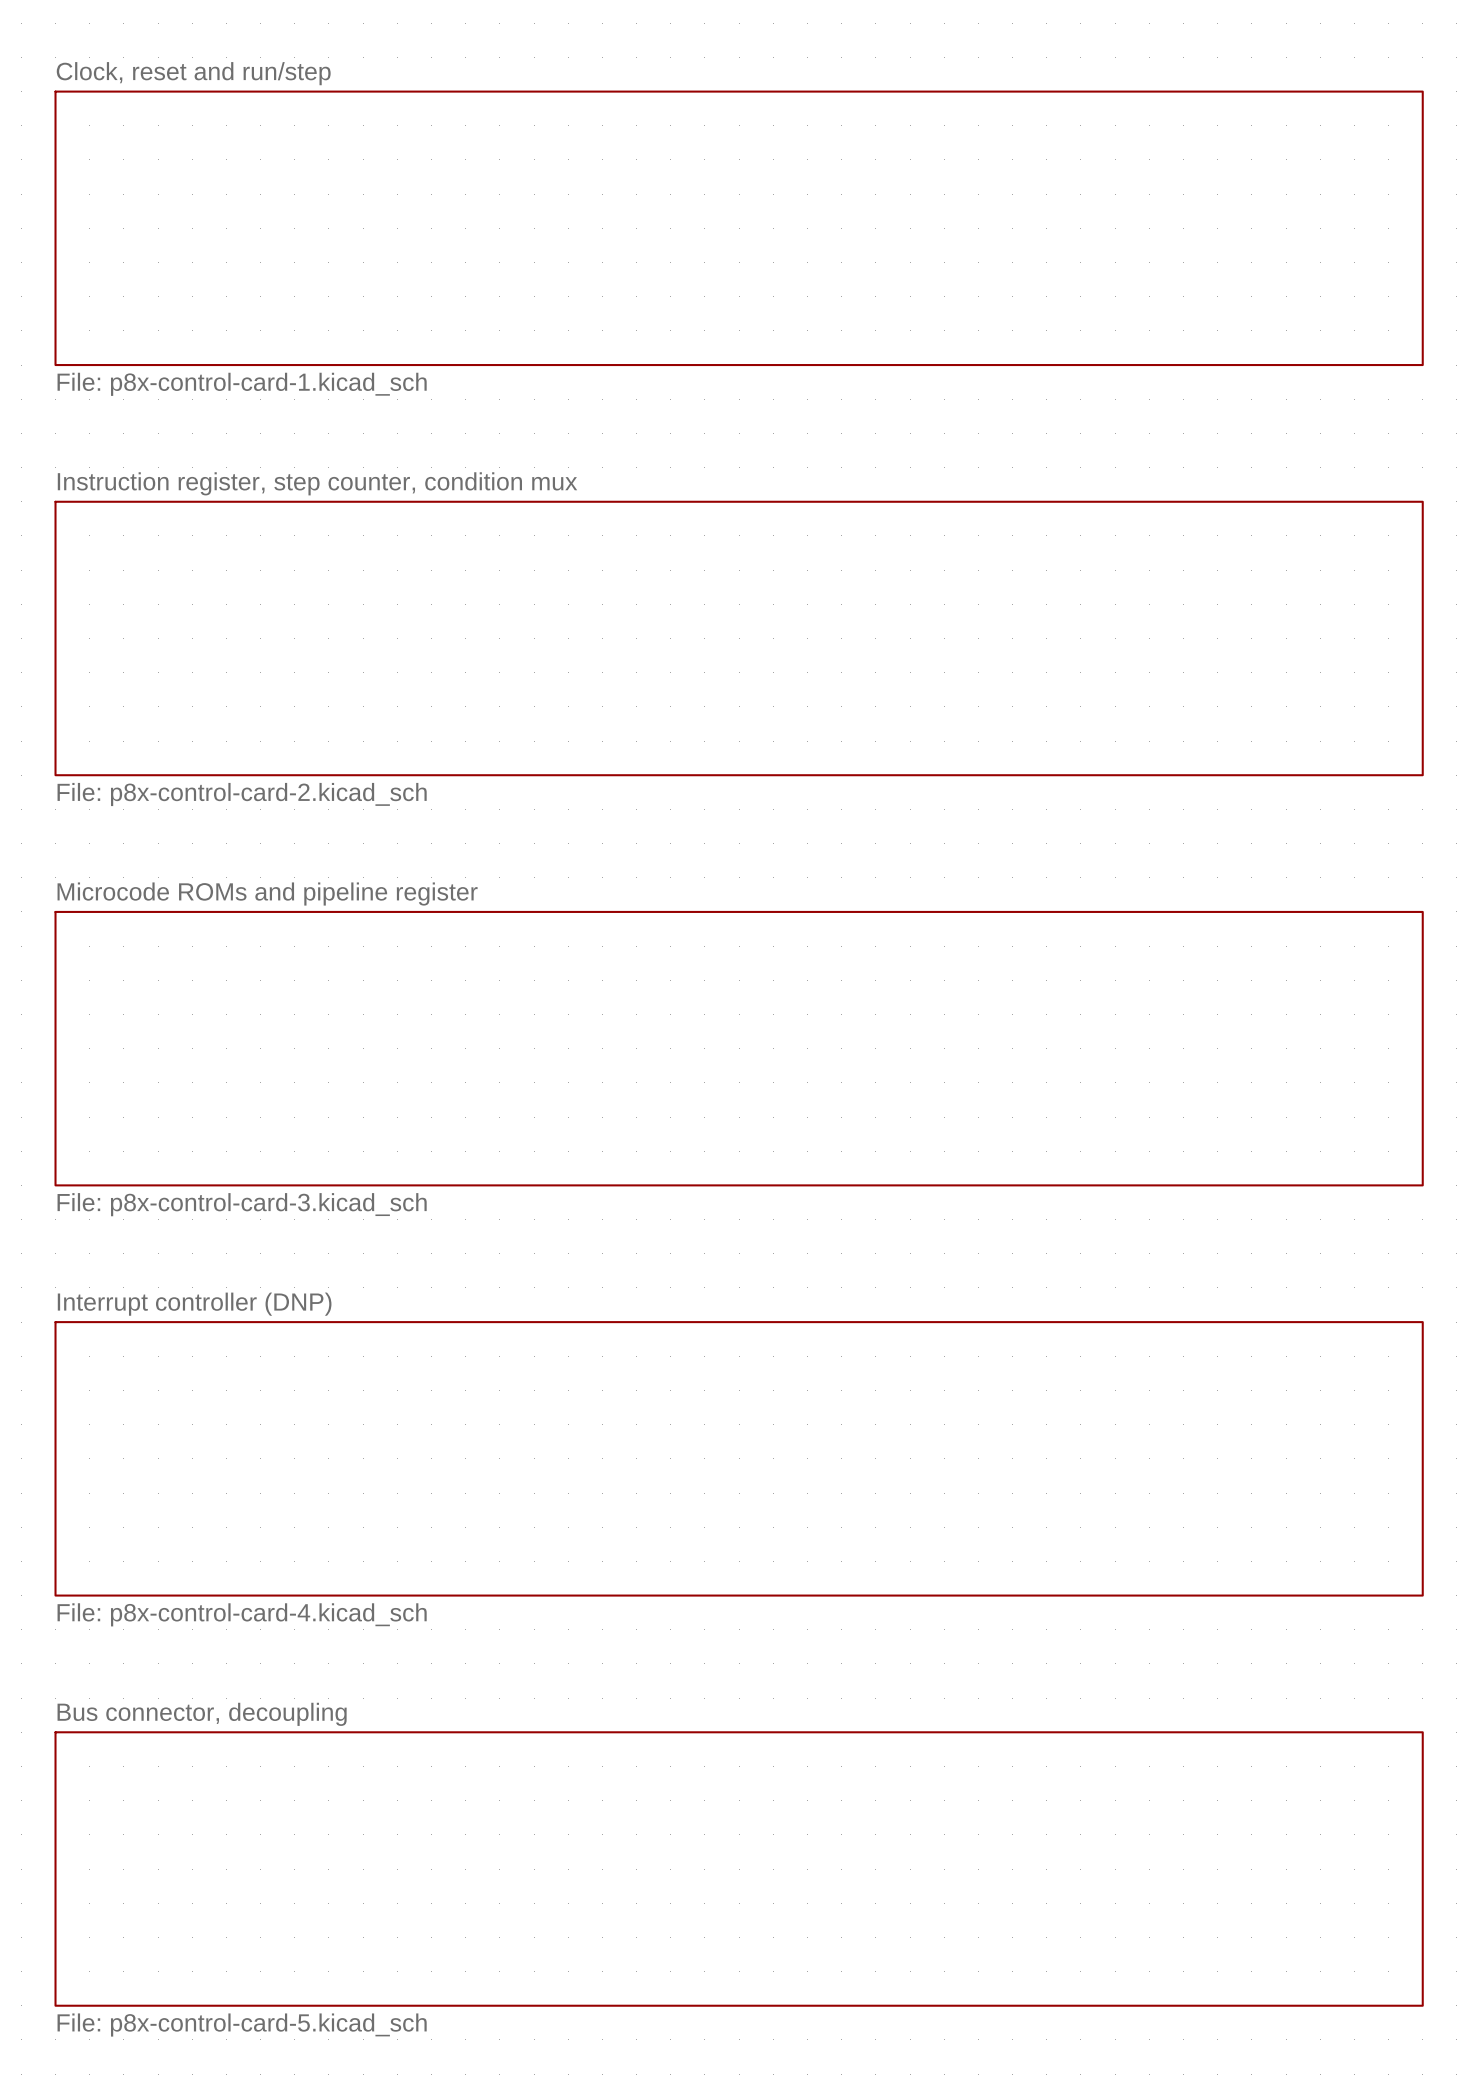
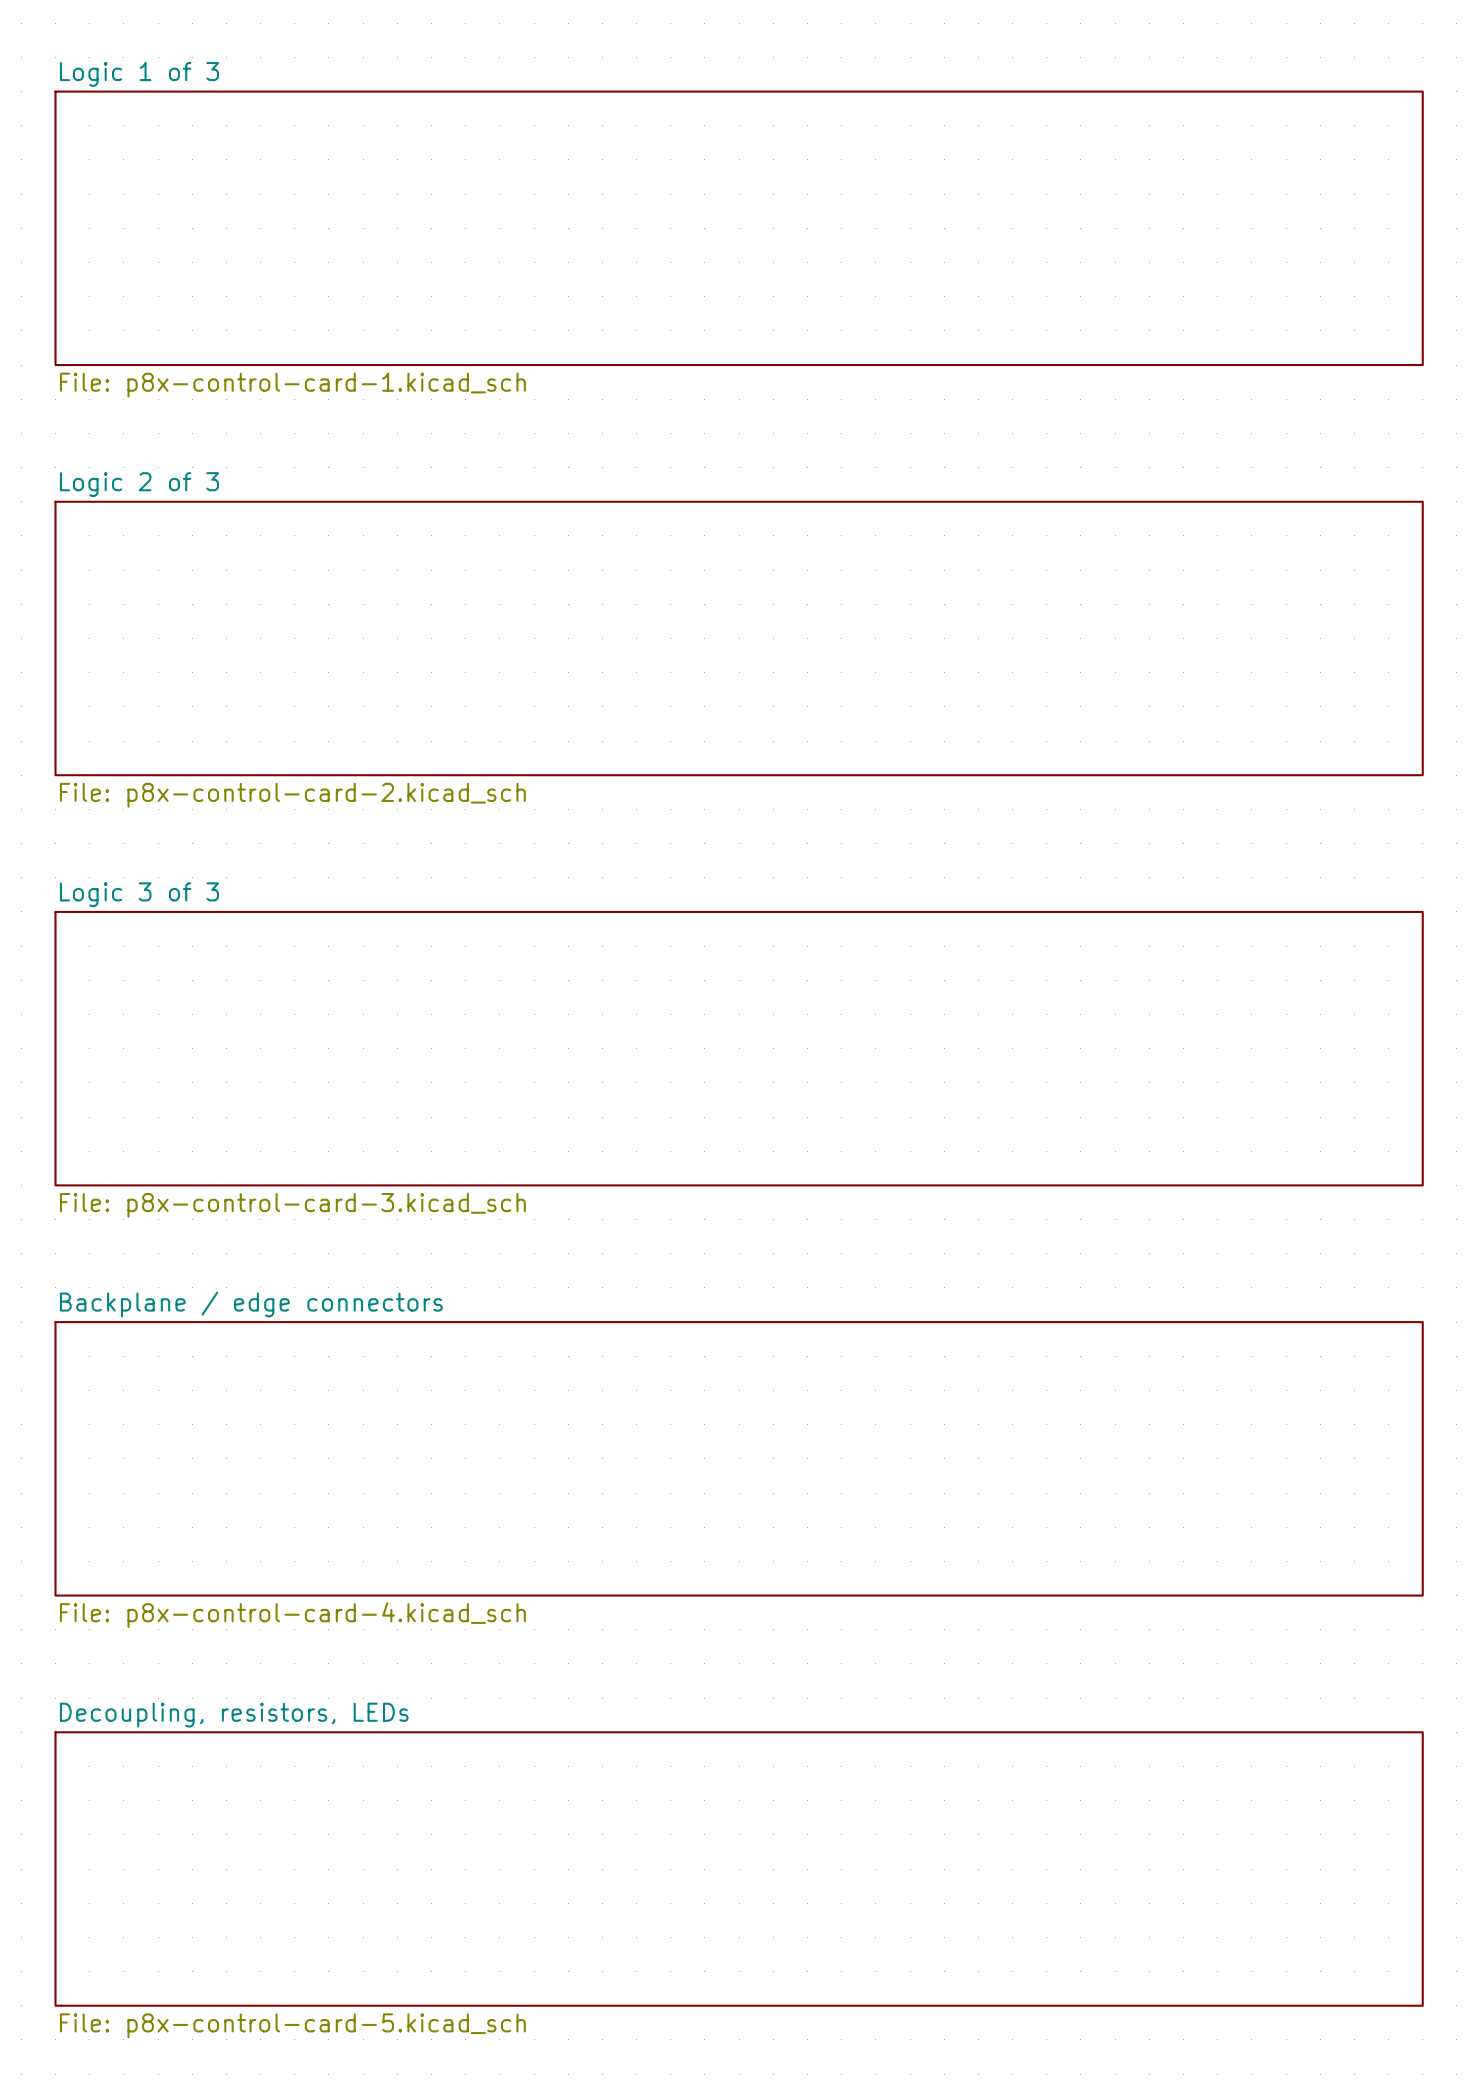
sheet Clock, reset and run/step name: Clock, reset and run/step (193, 73) -> Logic 1 of 3 (139, 74)
sheet Instruction register, step counter, condition mux name: Instruction register, step counter, condition mux (317, 483) -> Logic 2 of 3 (139, 484)
sheet Microcode ROMs and pipeline register name: Microcode ROMs and pipeline register (267, 894) -> Logic 3 of 3 (139, 894)
sheet Interrupt controller (DNP) name: Interrupt controller (DNP) (194, 1304) -> Backplane / edge connectors (251, 1304)
sheet Bus connector, decoupling name: Bus connector, decoupling (202, 1714) -> Decoupling, resistors, LEDs (234, 1715)

